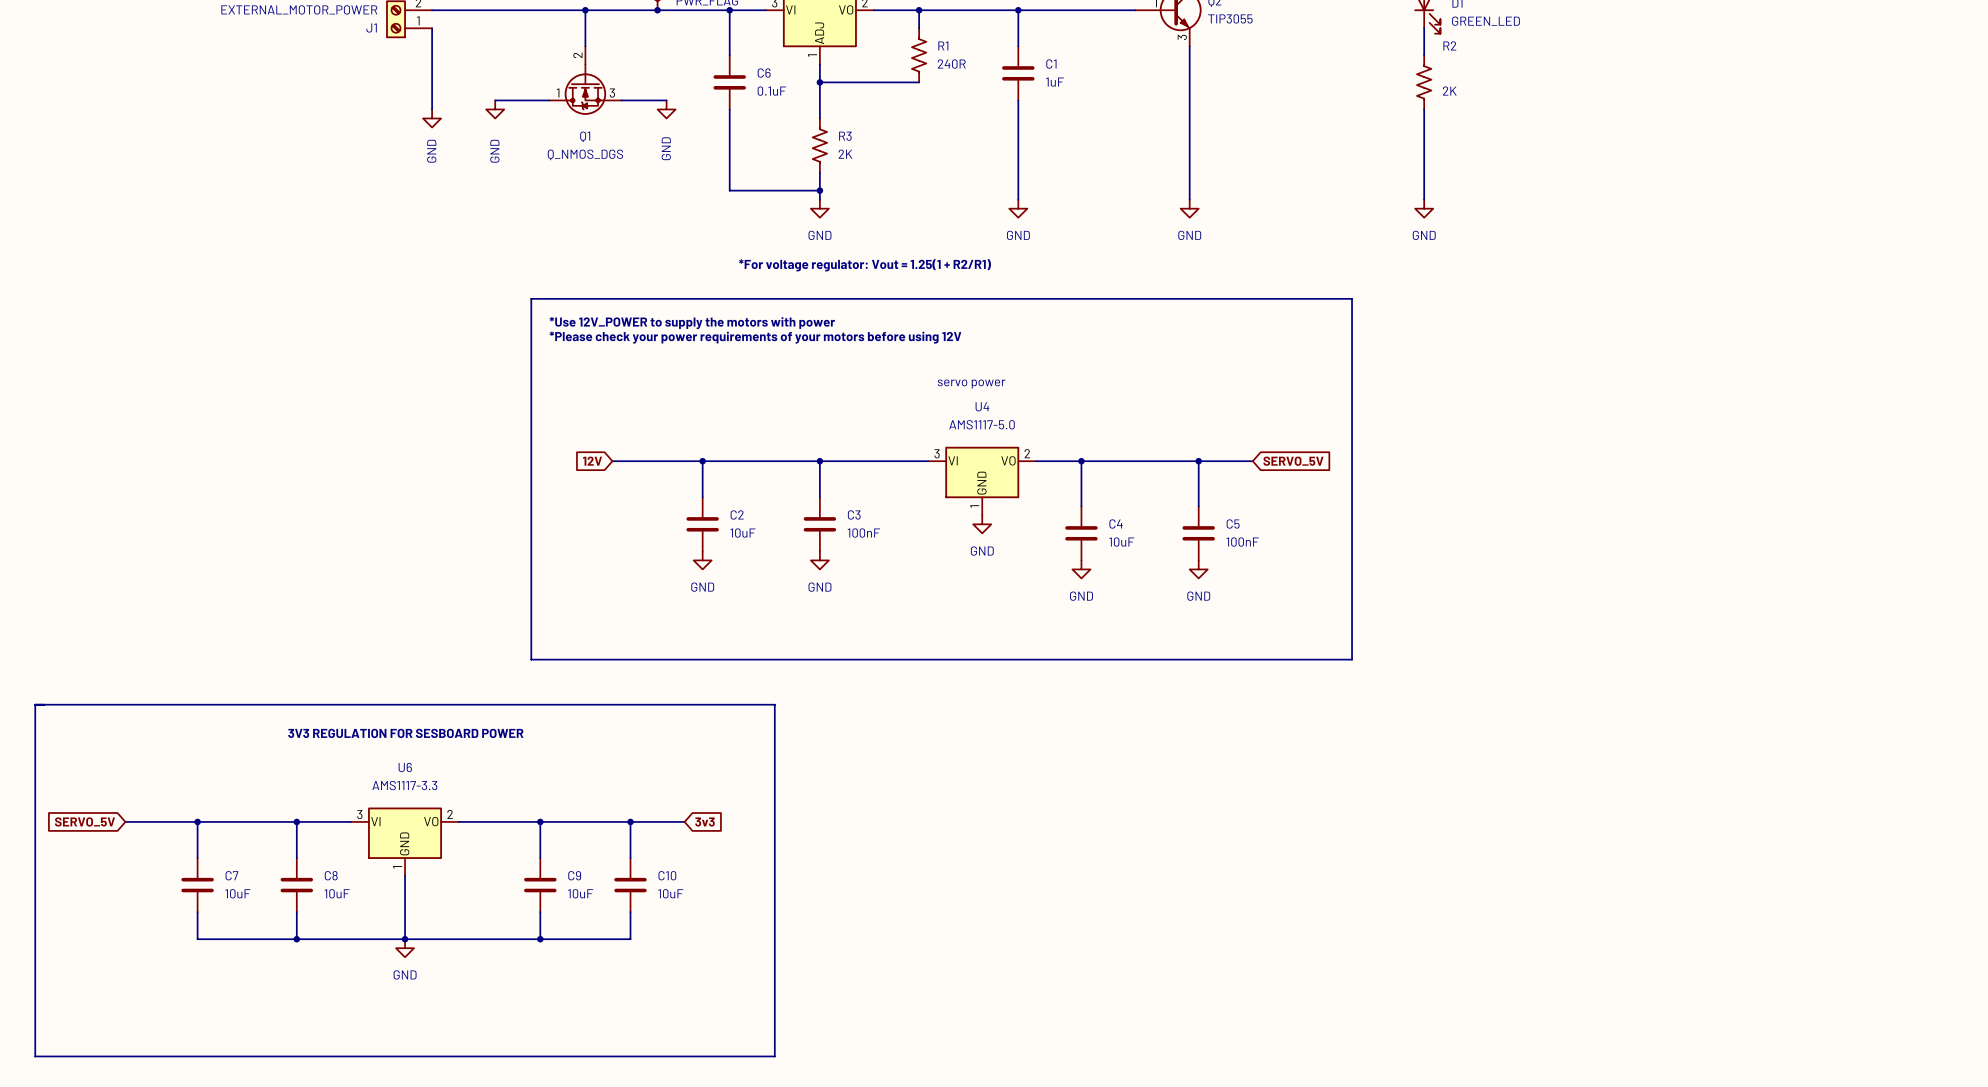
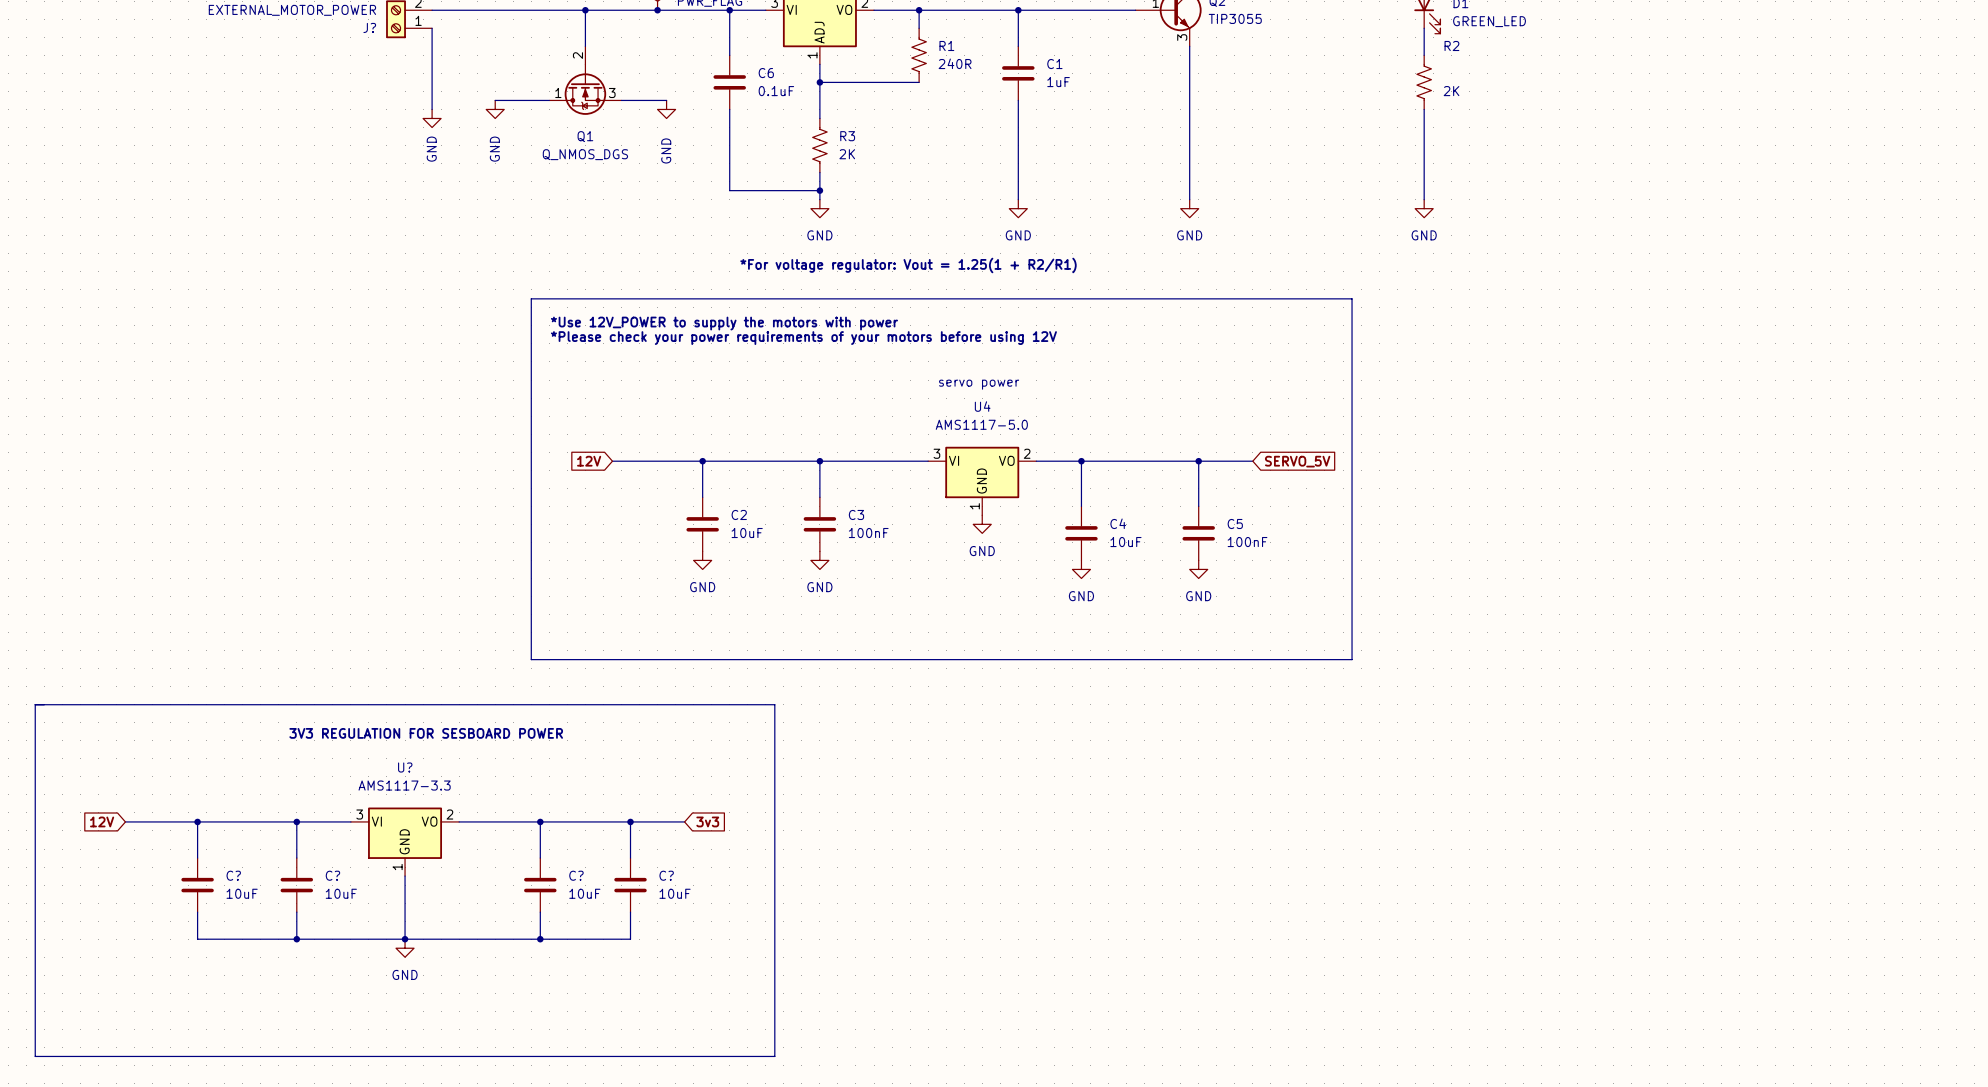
J1 name: J1 (371, 28) -> J? (369, 27)
U6 name: U6 (405, 767) -> U? (405, 767)
global label: SERVO_5V (84, 821) -> 12V (102, 821)
C7 name: C7 (231, 875) -> C? (233, 875)
C8 name: C8 (331, 875) -> C? (332, 875)
C9 name: C9 (574, 875) -> C? (576, 875)
C10 name: C10 (667, 875) -> C? (666, 875)

